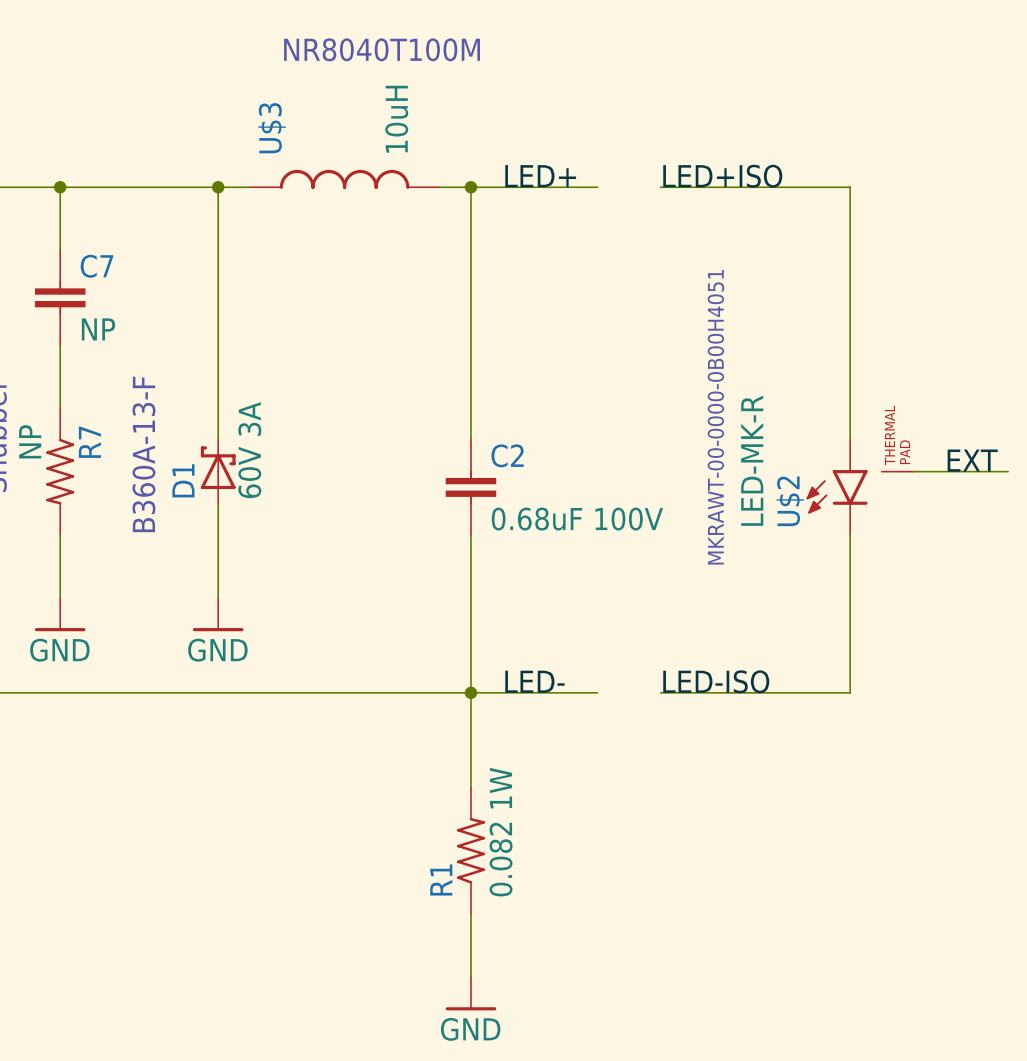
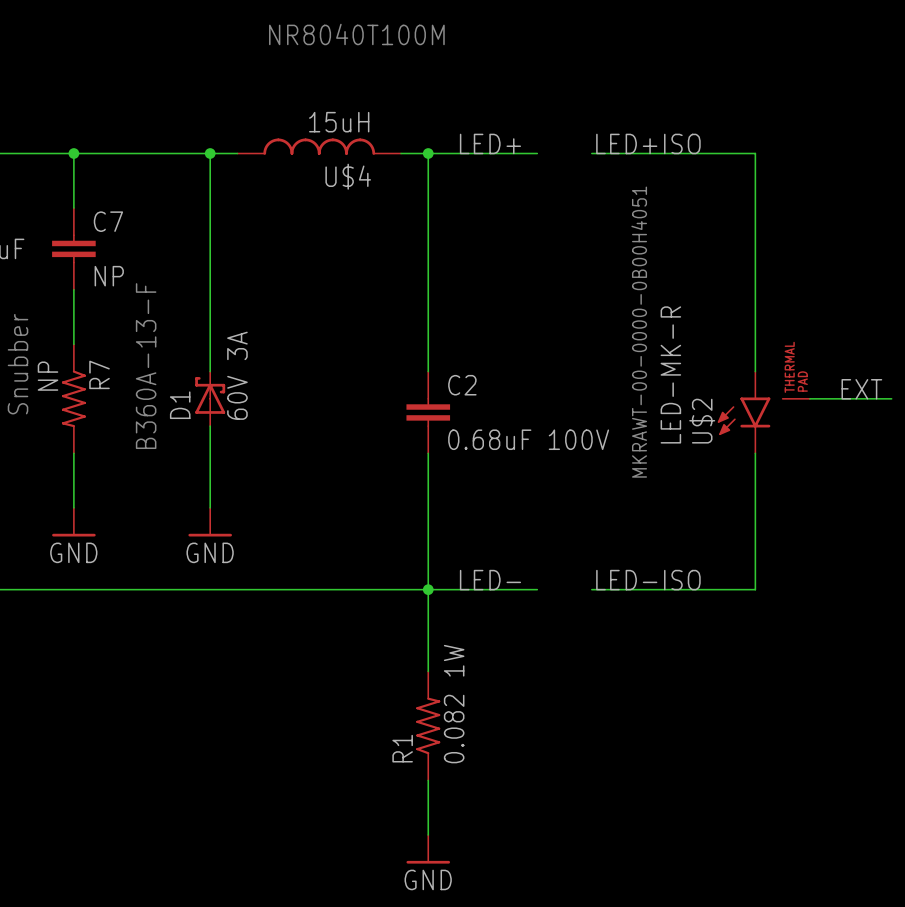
U$3 value: 10uH (396, 119) -> 15uH (339, 122)
U$3 name: U$3 (272, 128) -> U$4 (348, 176)

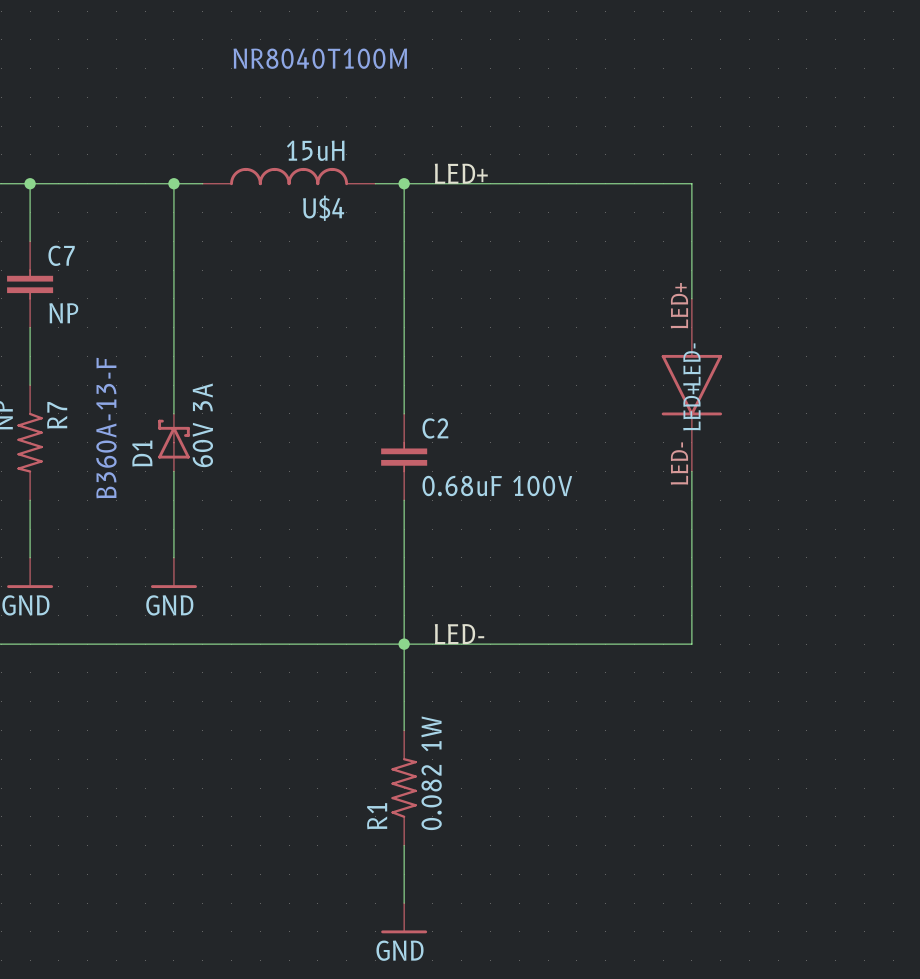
label: LED+ISO (648, 143) -> none
wire: none -> (519, 183) (576, 183)
wire: (700, 153) (755, 153) (755, 371) -> (691, 183) (691, 298)
text: MKRAWT-00-0000-0B00H4051 (639, 332) -> none
part: none -> (691, 385)
label: EXT (861, 389) -> none
wire: (809, 398) (891, 398) -> none
U$2: LED-MK-R (763, 412) -> none
wire: (755, 453) (755, 589) (700, 589) -> (691, 471) (691, 644)
label: LED-ISO (648, 580) -> none
wire: none -> (519, 644) (576, 644)

